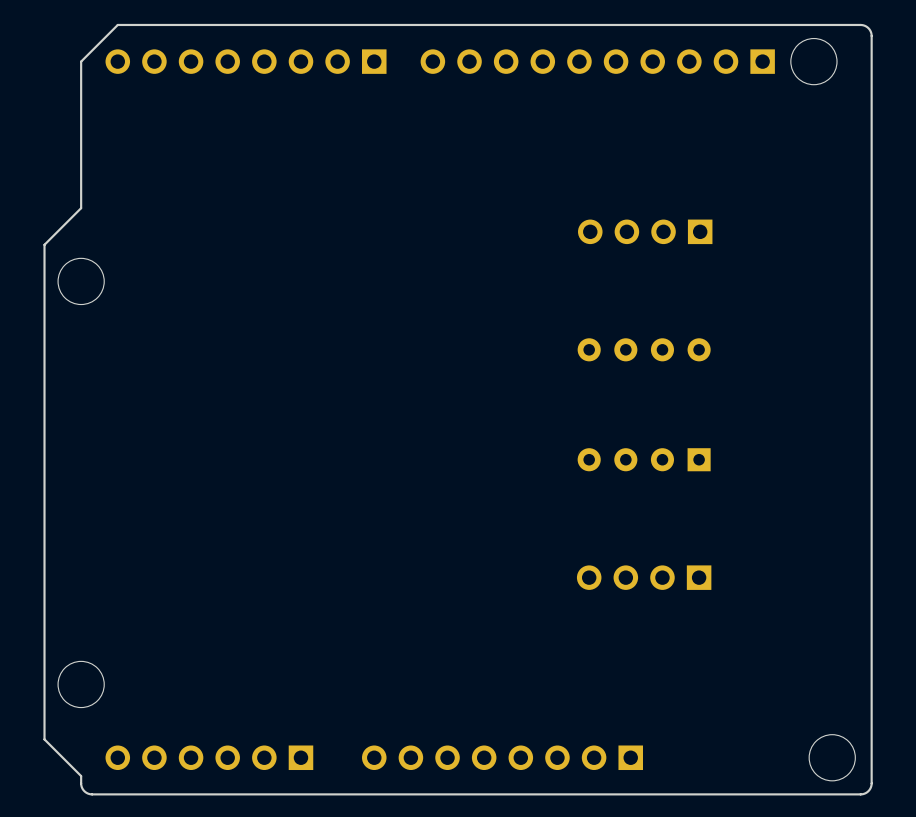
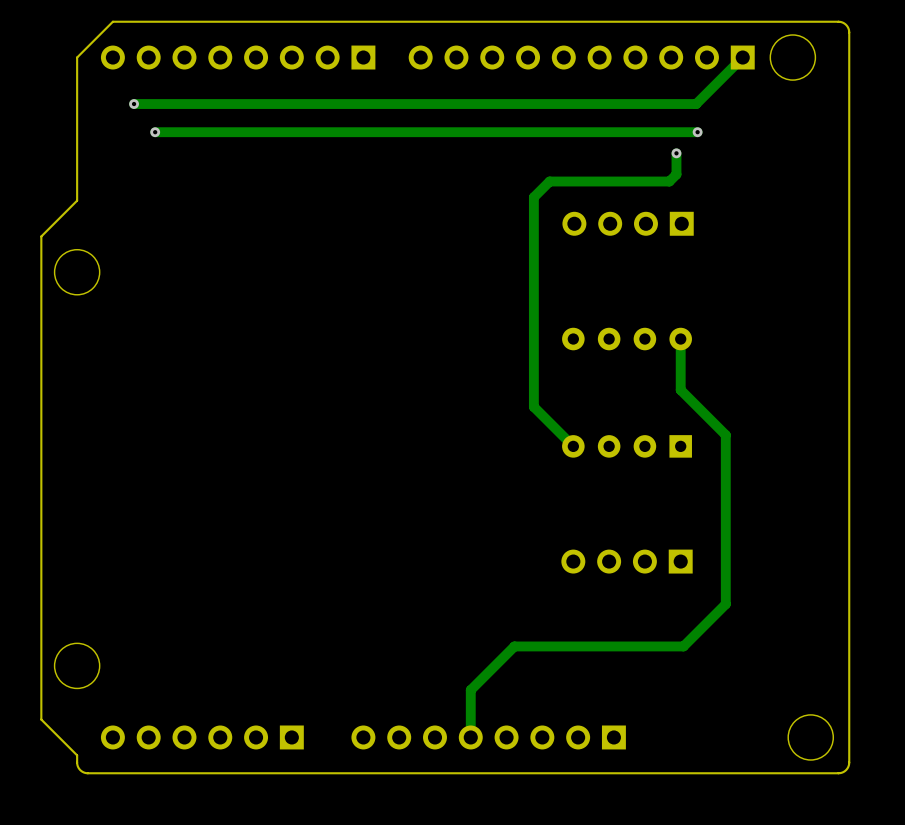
track: none -> (742, 57) (696, 104) (134, 104)
via: none -> (134, 104)
via: none -> (155, 132)
track: none -> (697, 132) (155, 132)
via: none -> (697, 132)
track: none -> (676, 153) (676, 174) (669, 181) (549, 181) (533, 197) (533, 406) (573, 446)
via: none -> (676, 153)
track: none -> (680, 339) (680, 390) (725, 435) (725, 604) (683, 646) (514, 646) (470, 690) (470, 737)

